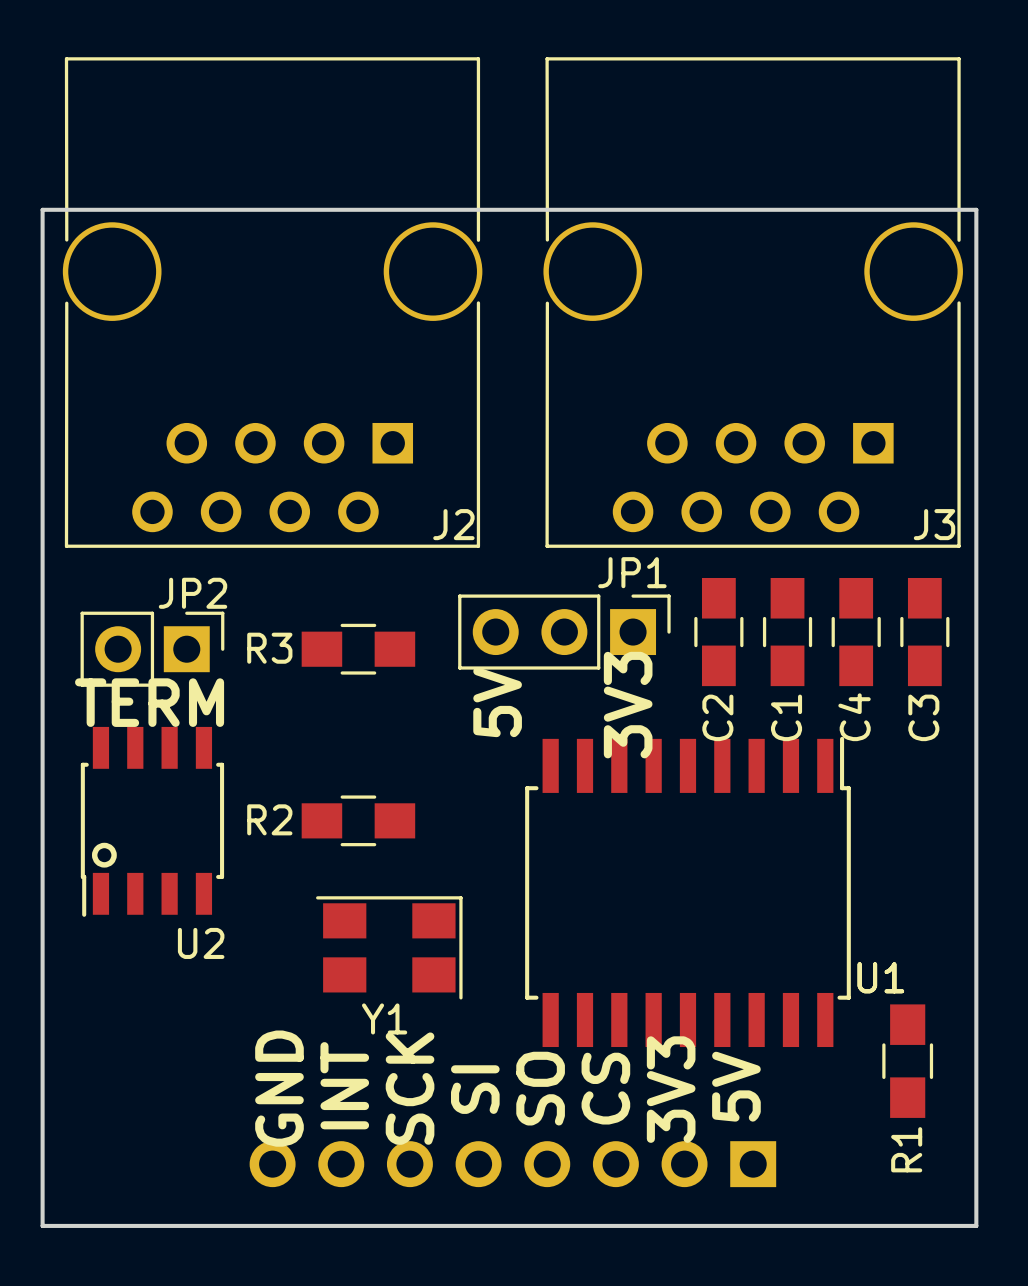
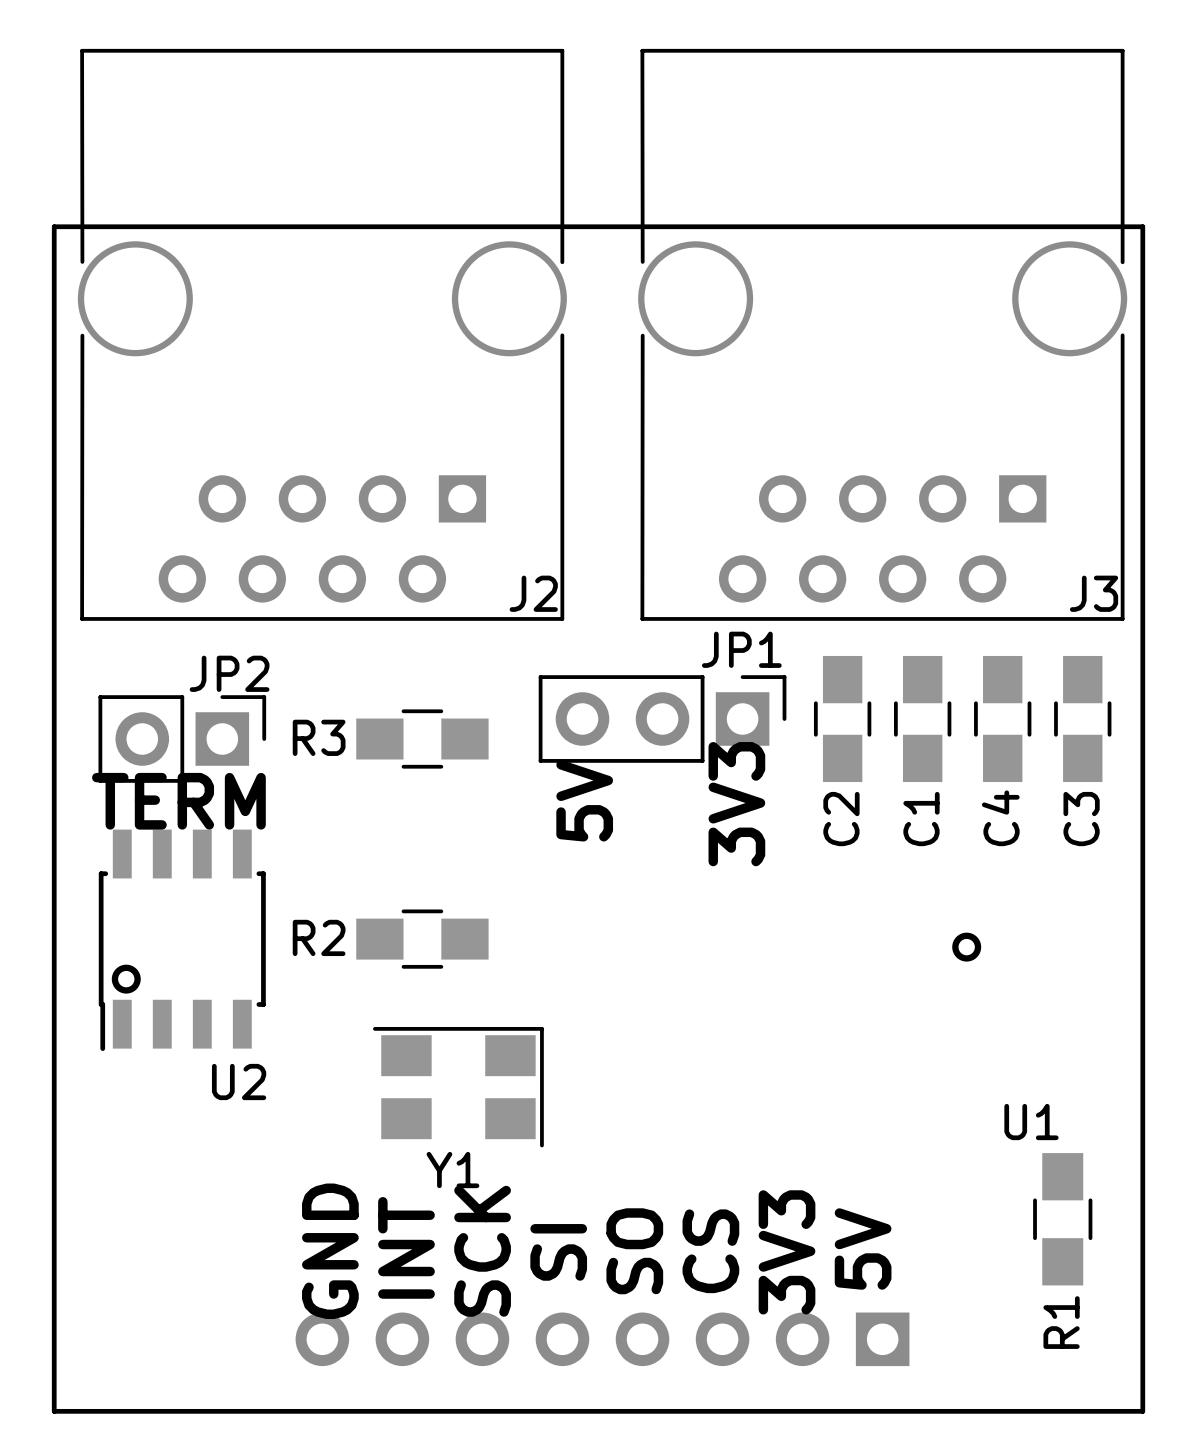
drawing: none -> [952, 932, 982, 962]
U1: (687, 891) -> none

